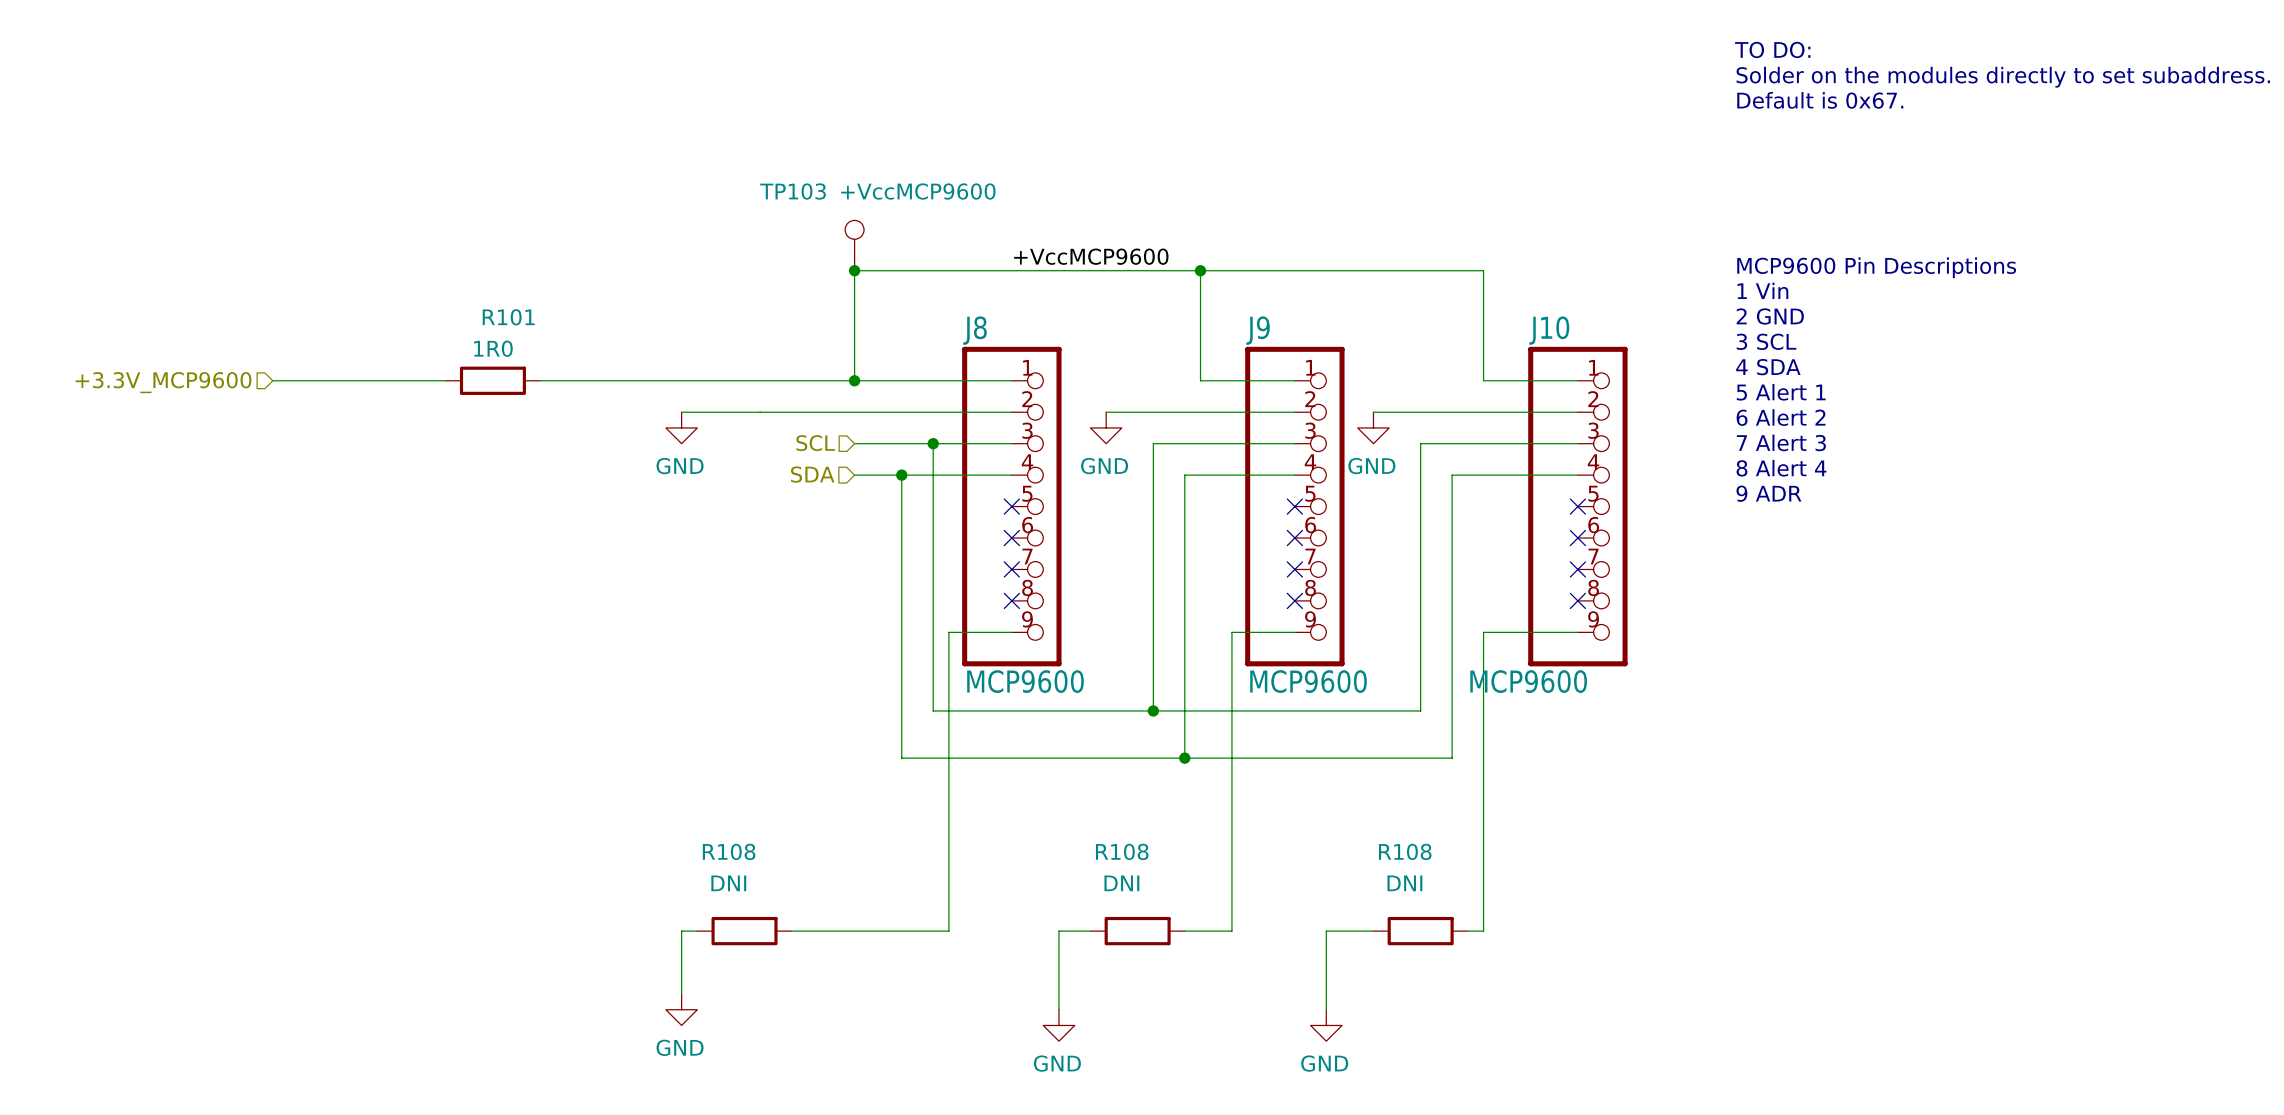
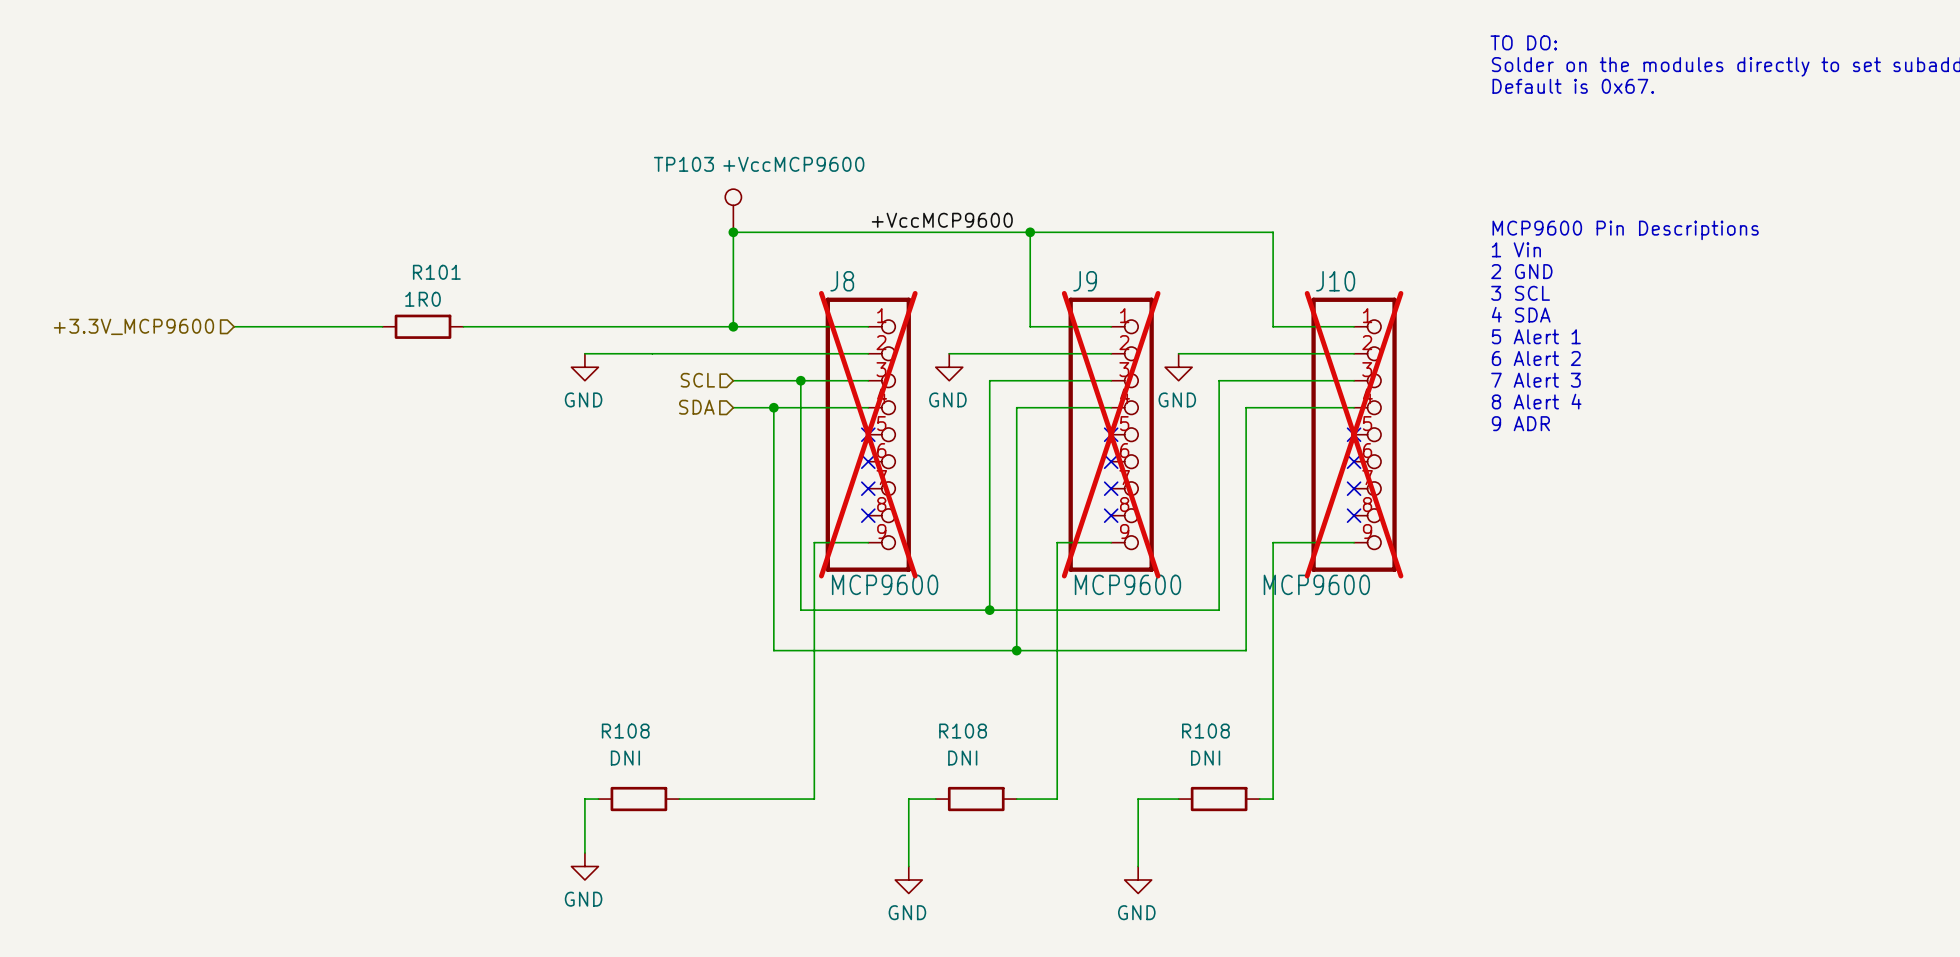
J8 do-not-place cross: none -> (868, 434)
J9 do-not-place cross: none -> (1111, 434)
J10 do-not-place cross: none -> (1354, 434)

